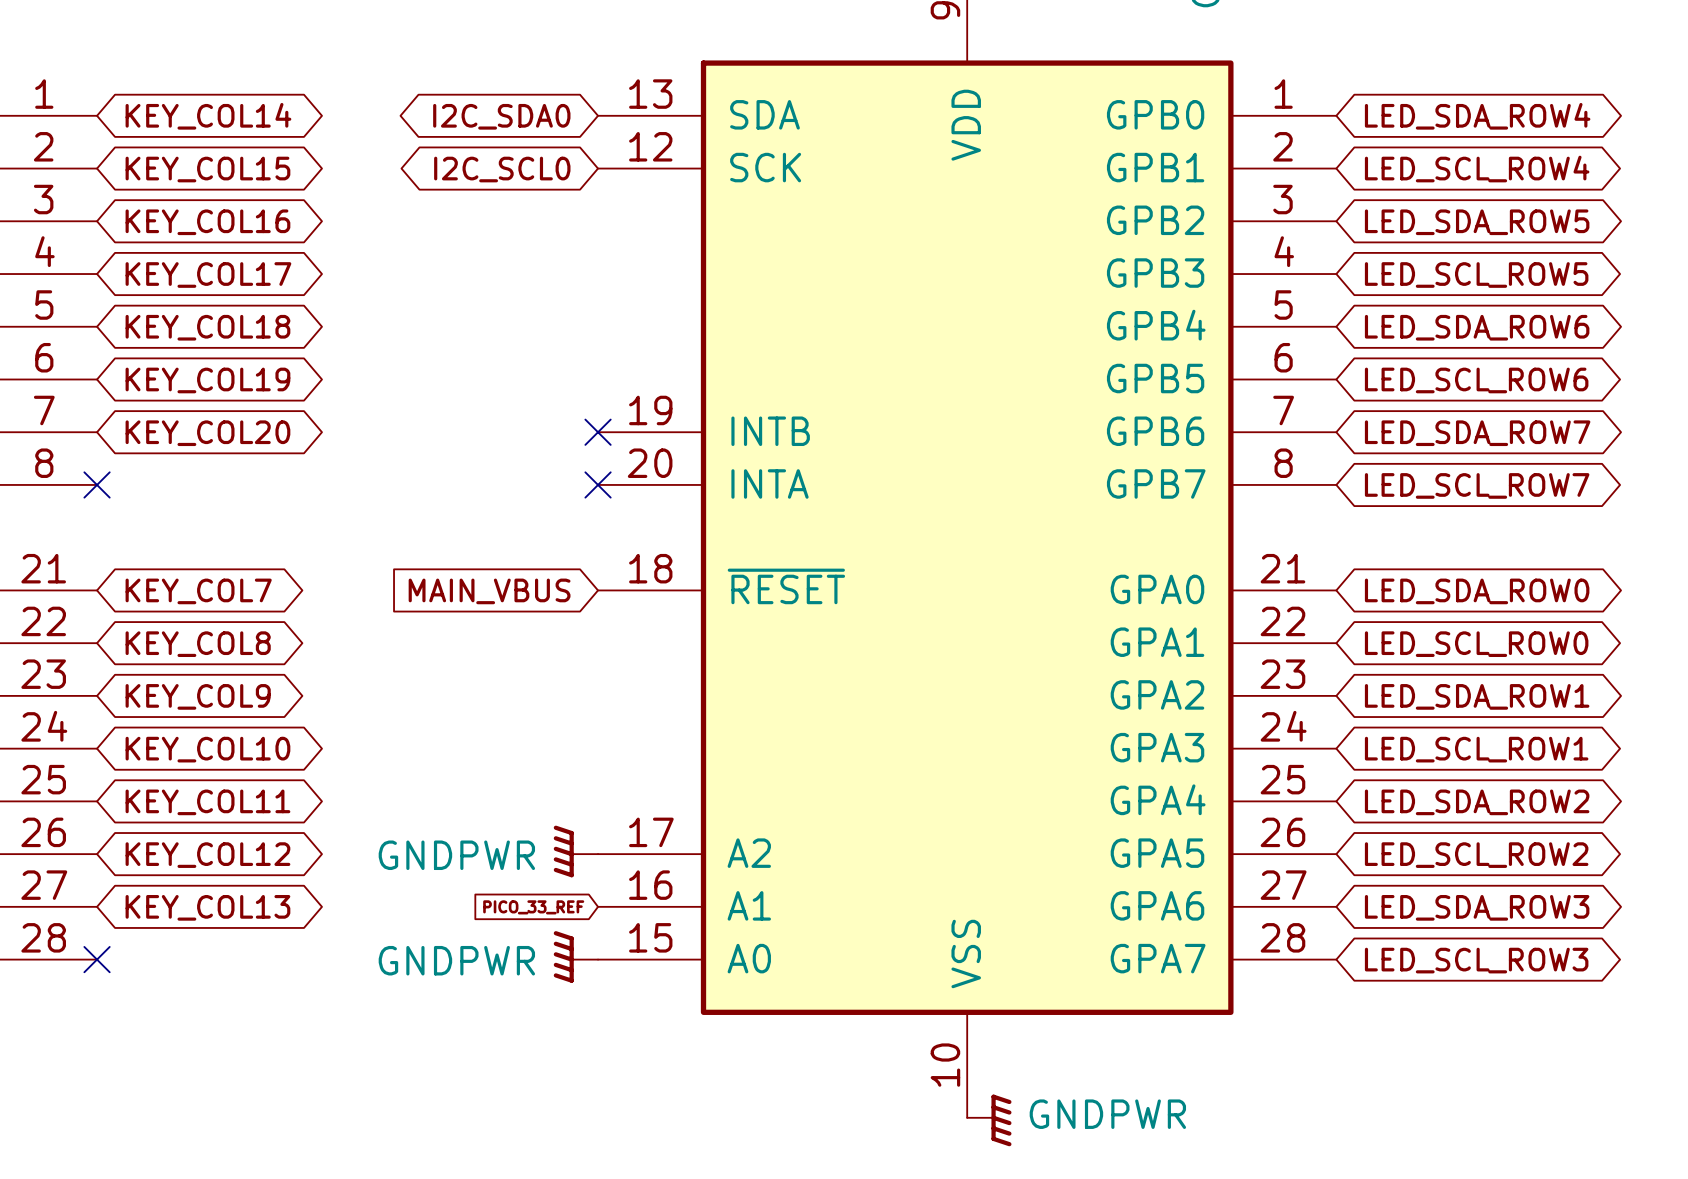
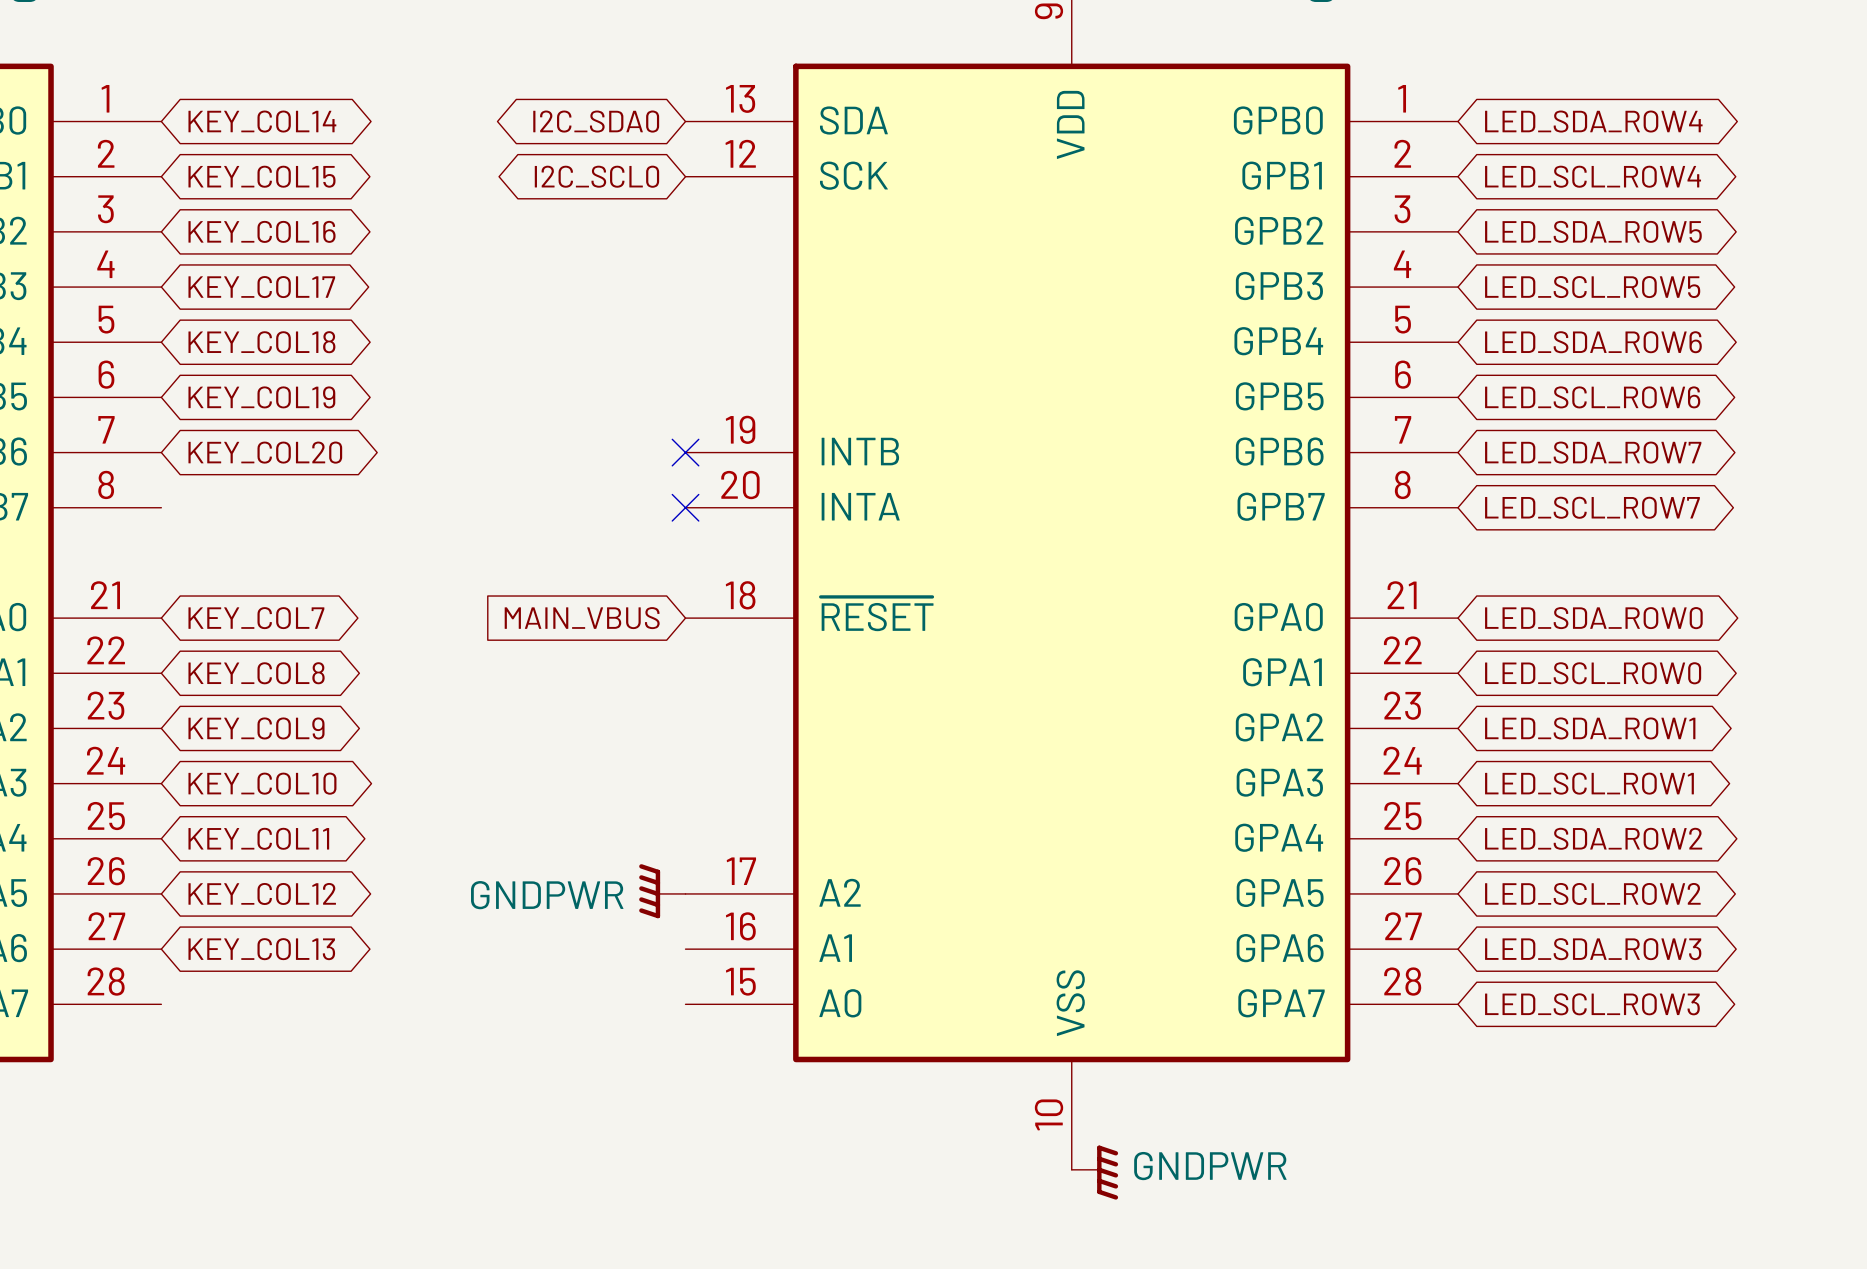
no-connect mark: (97, 484) -> none
global label: PICO_33_REF (533, 907) -> none
power symbol: GNDPWR (575, 956) -> none
no-connect mark: (97, 959) -> none

